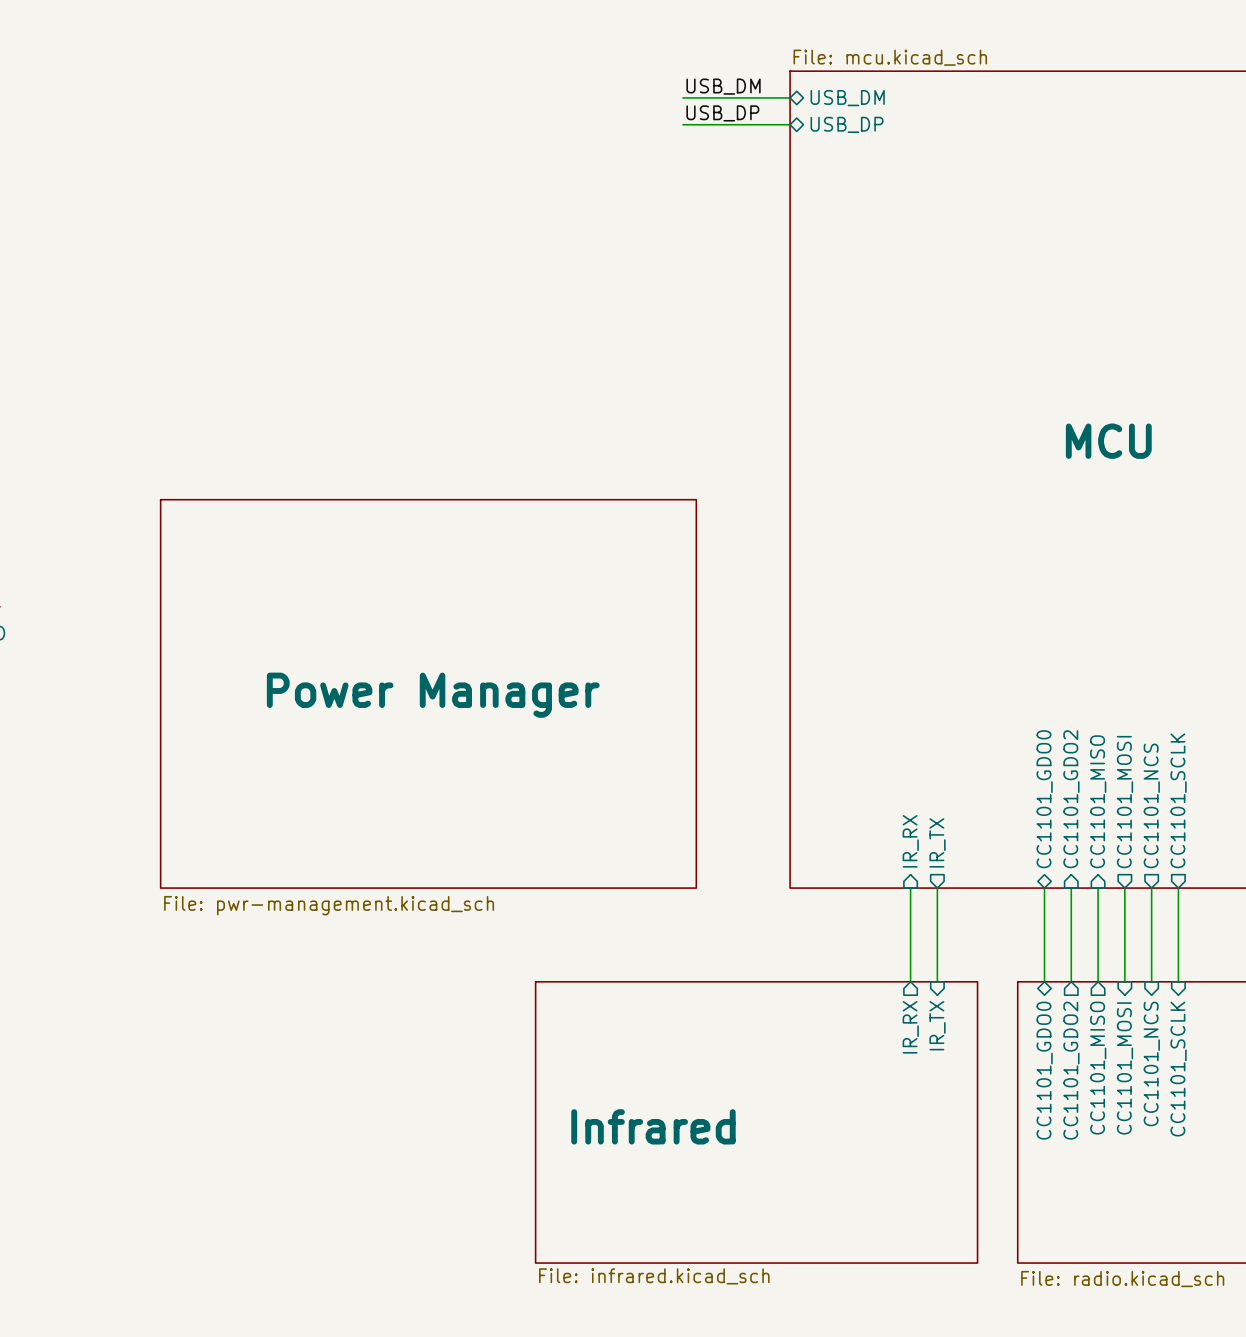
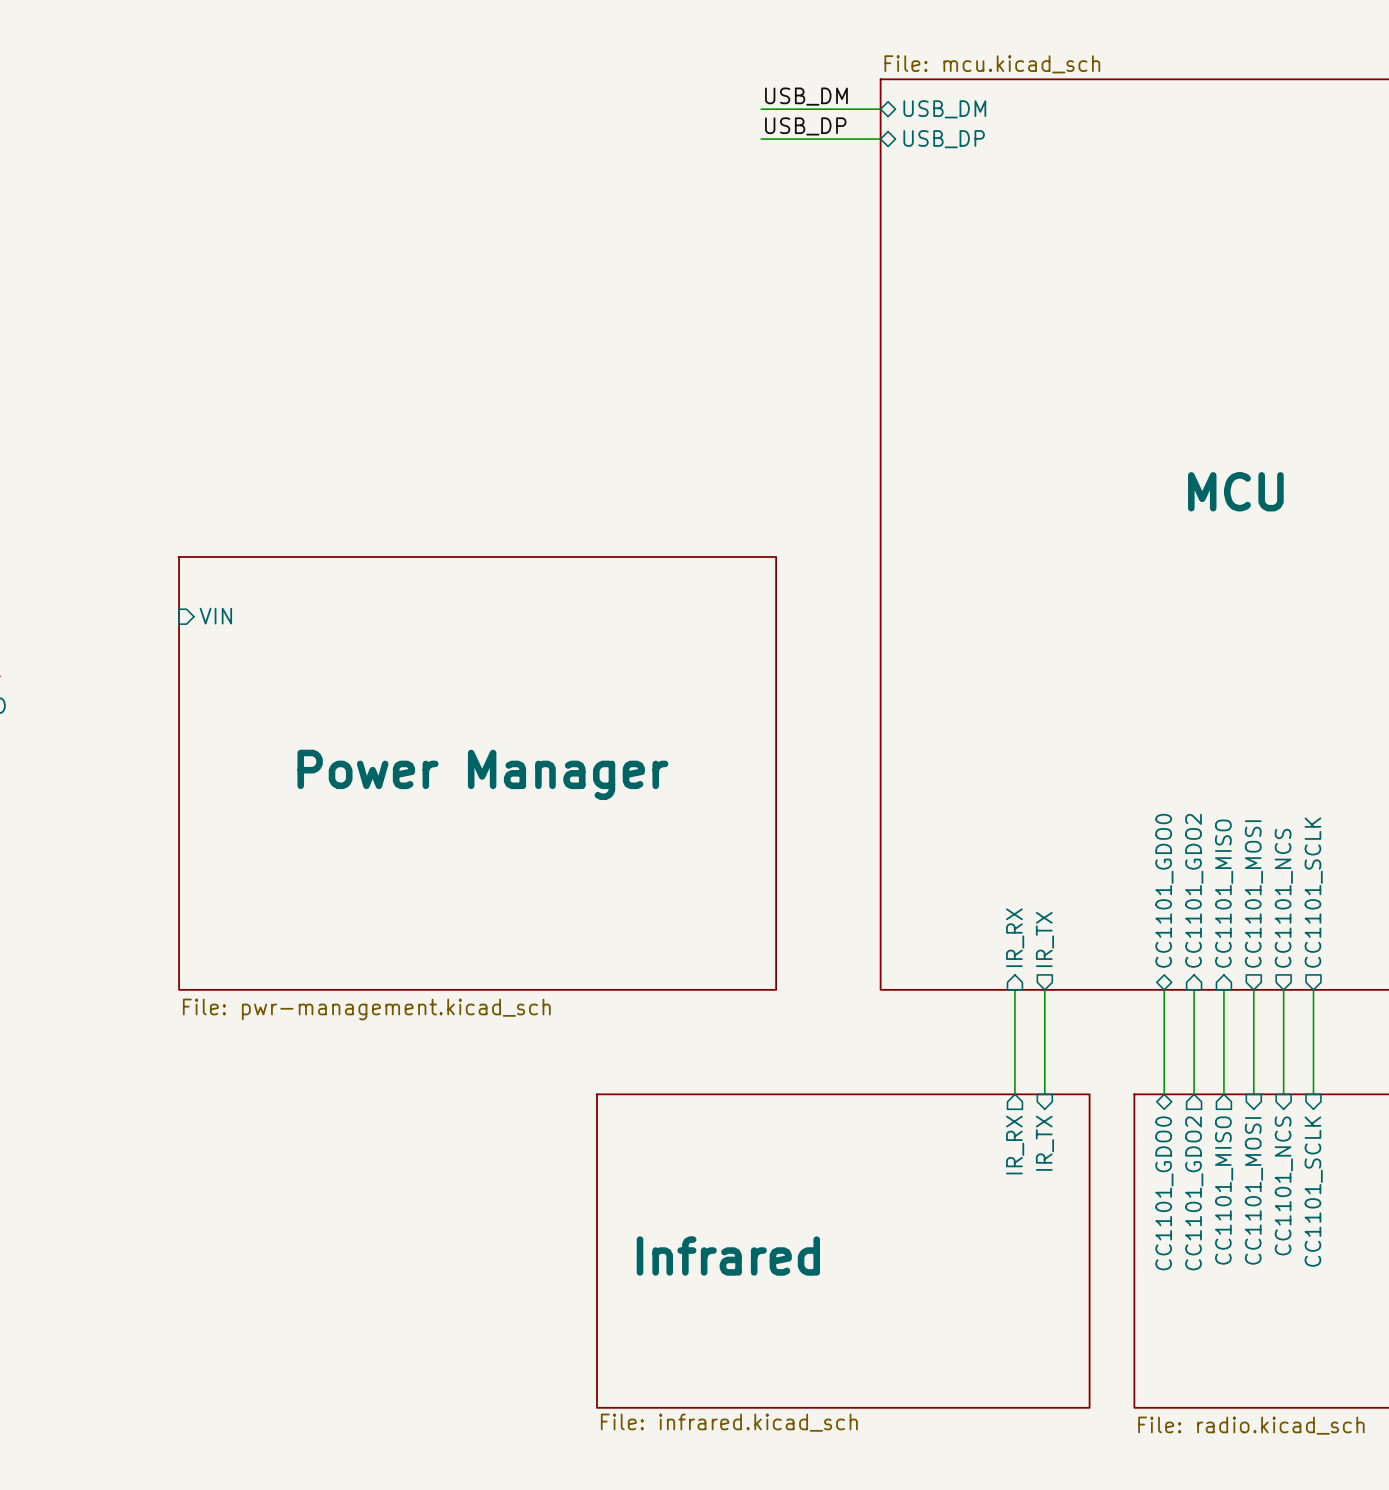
sheet pin: none -> VIN (215, 616)

